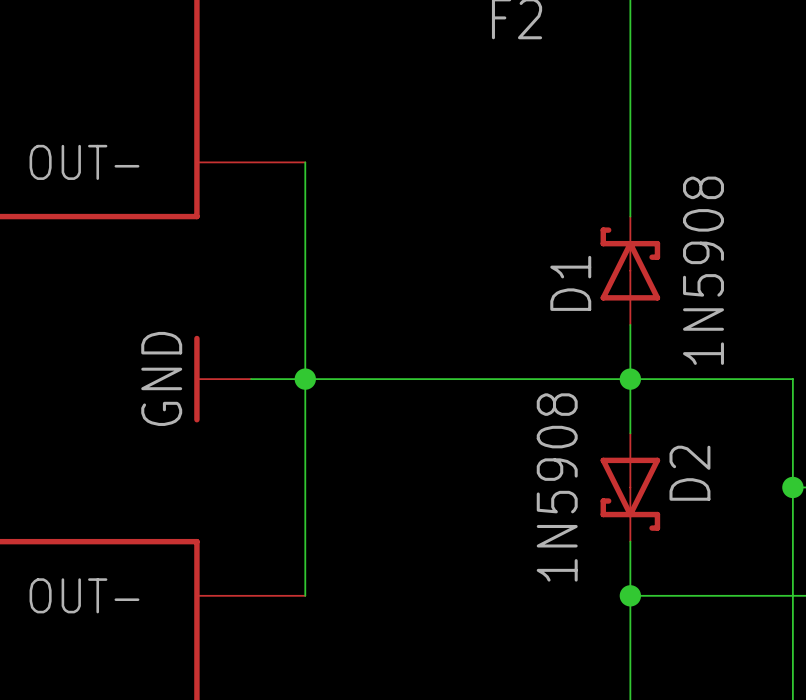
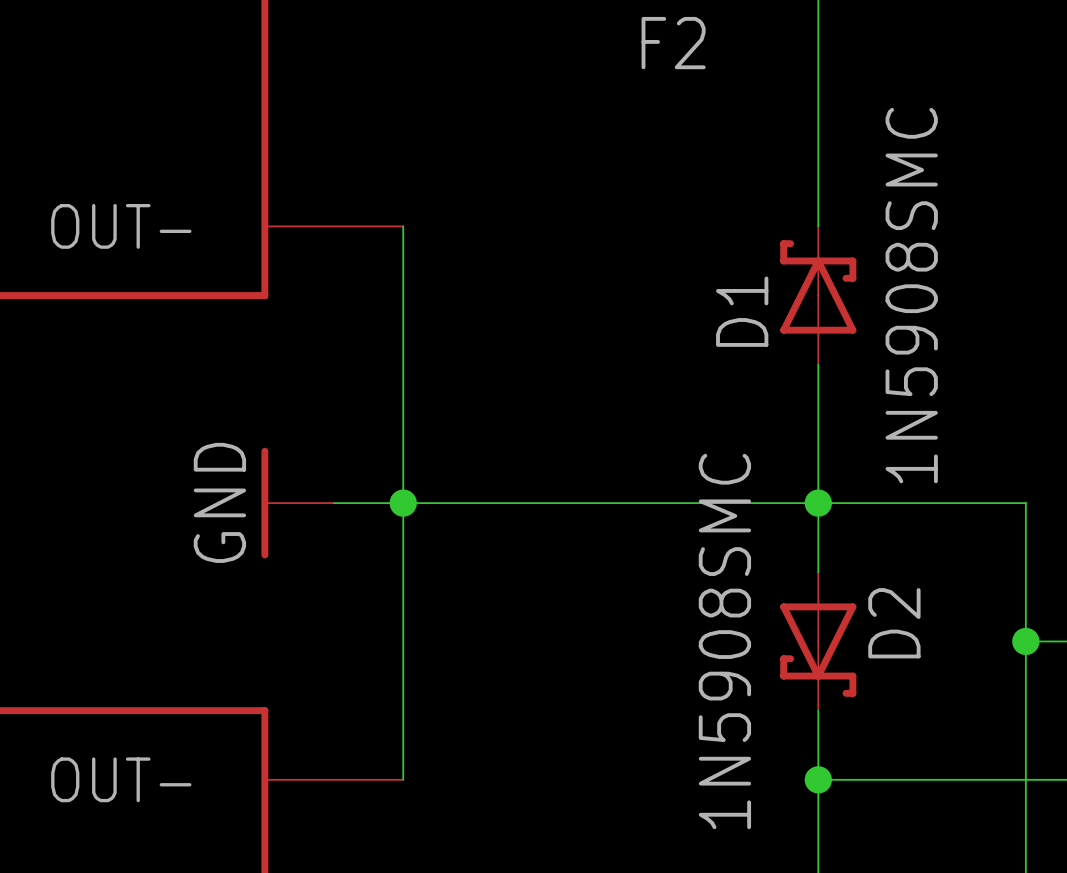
D1 position: (630, 270) -> (818, 295)
D1 value: 1N5908 (703, 270) -> 1N5908SMC (911, 295)
D2 value: 1N5908 (557, 487) -> 1N5908SMC (724, 641)

